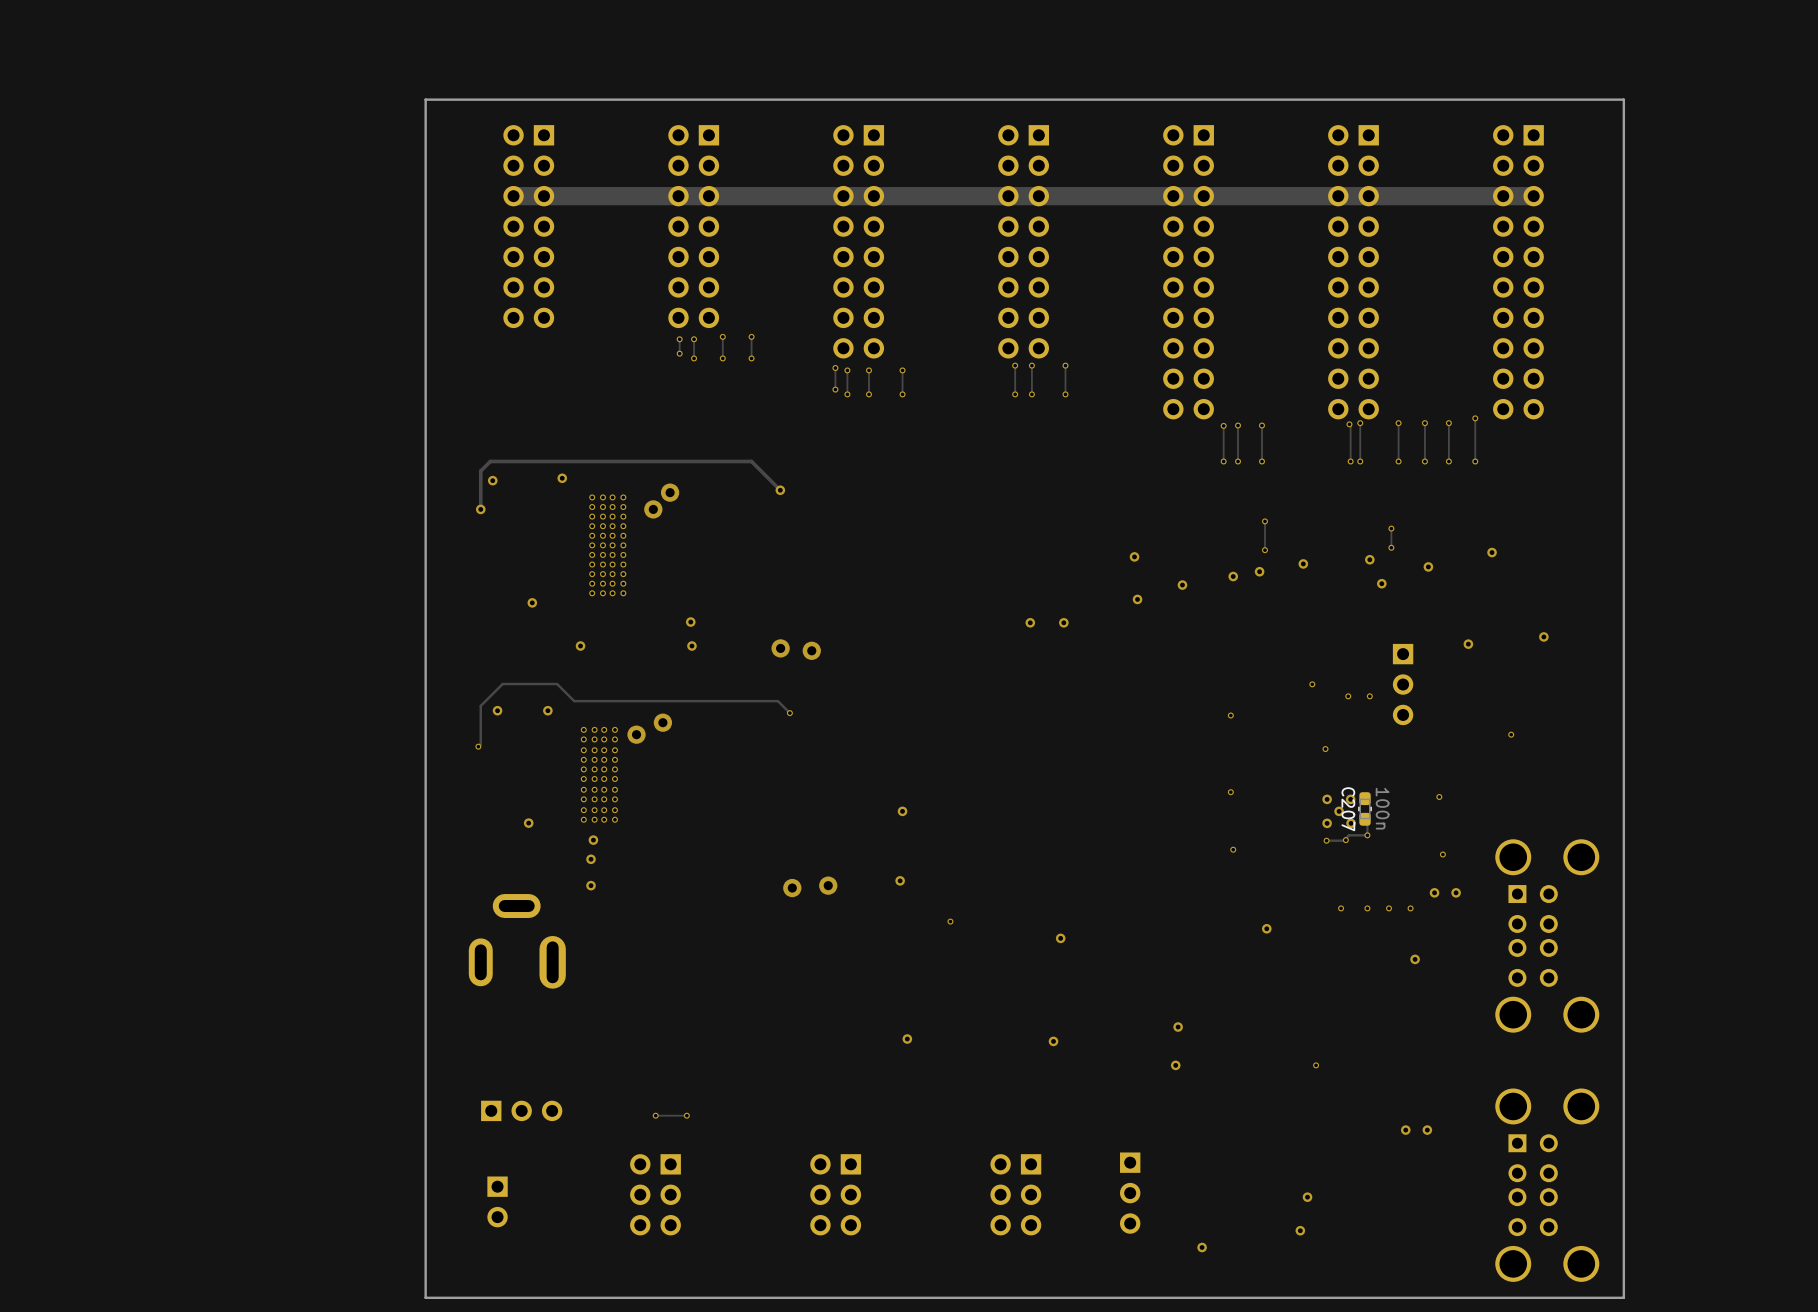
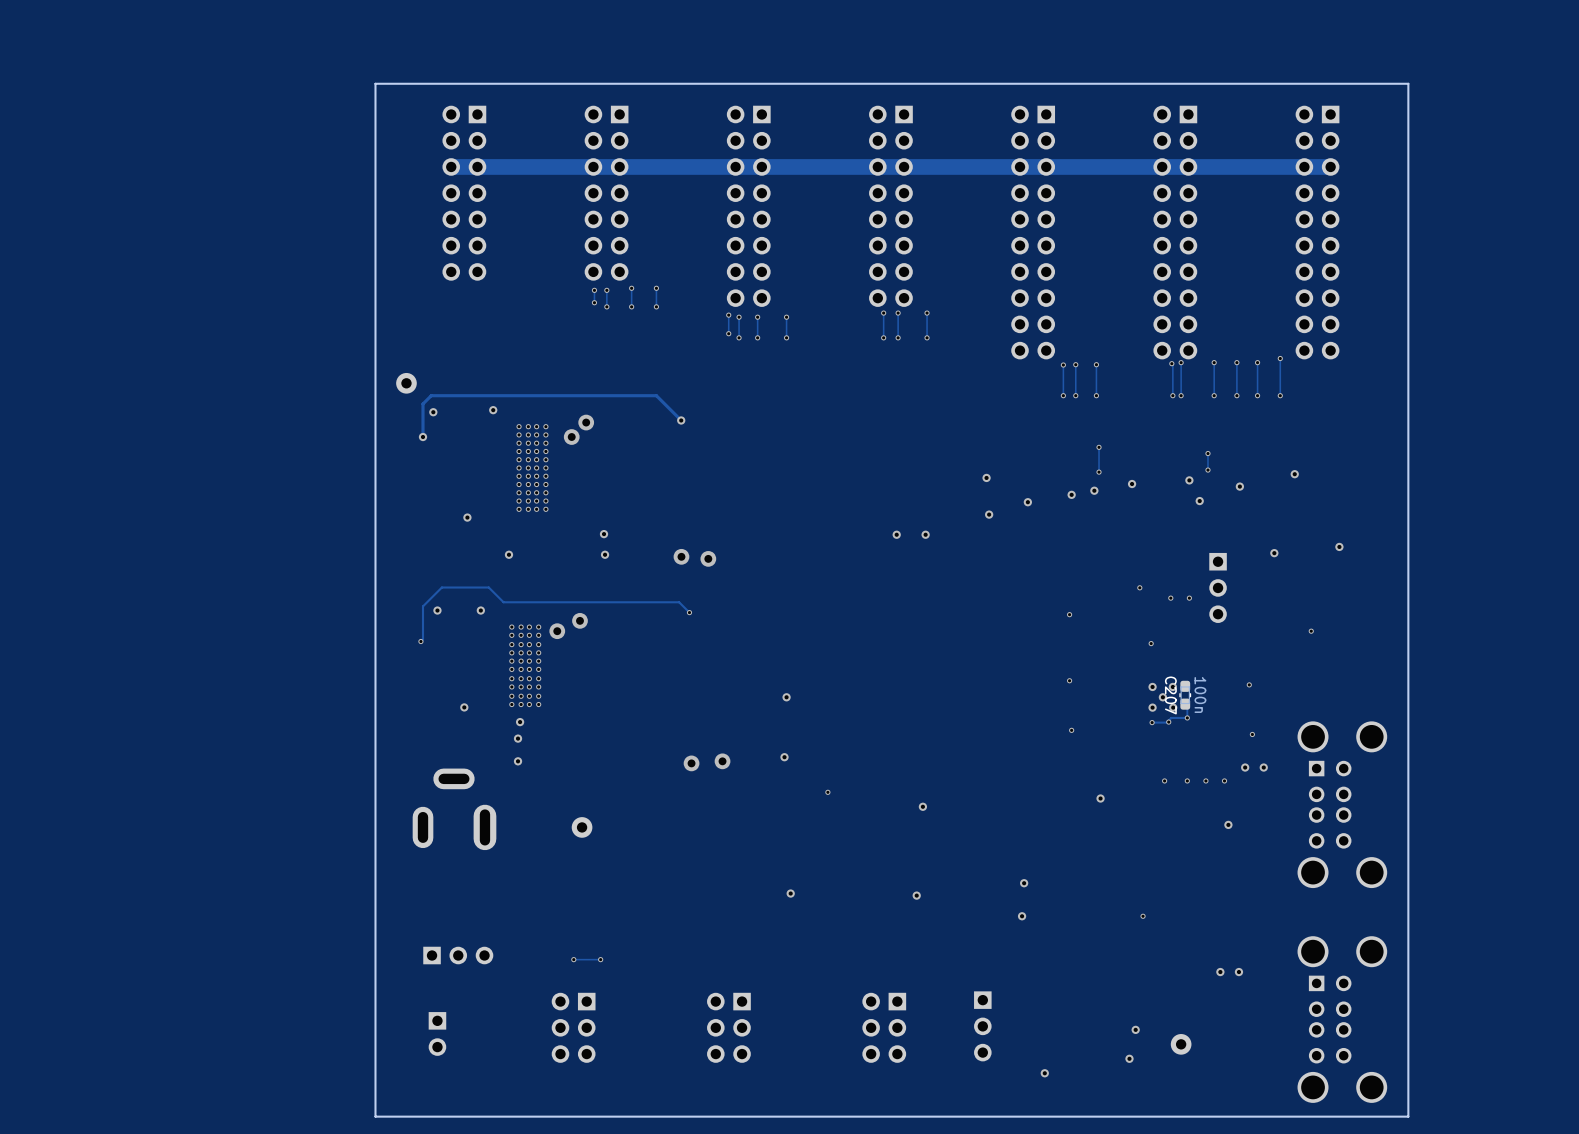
part: none -> (406, 383)
part: none -> (582, 827)
part: none -> (1181, 1044)

